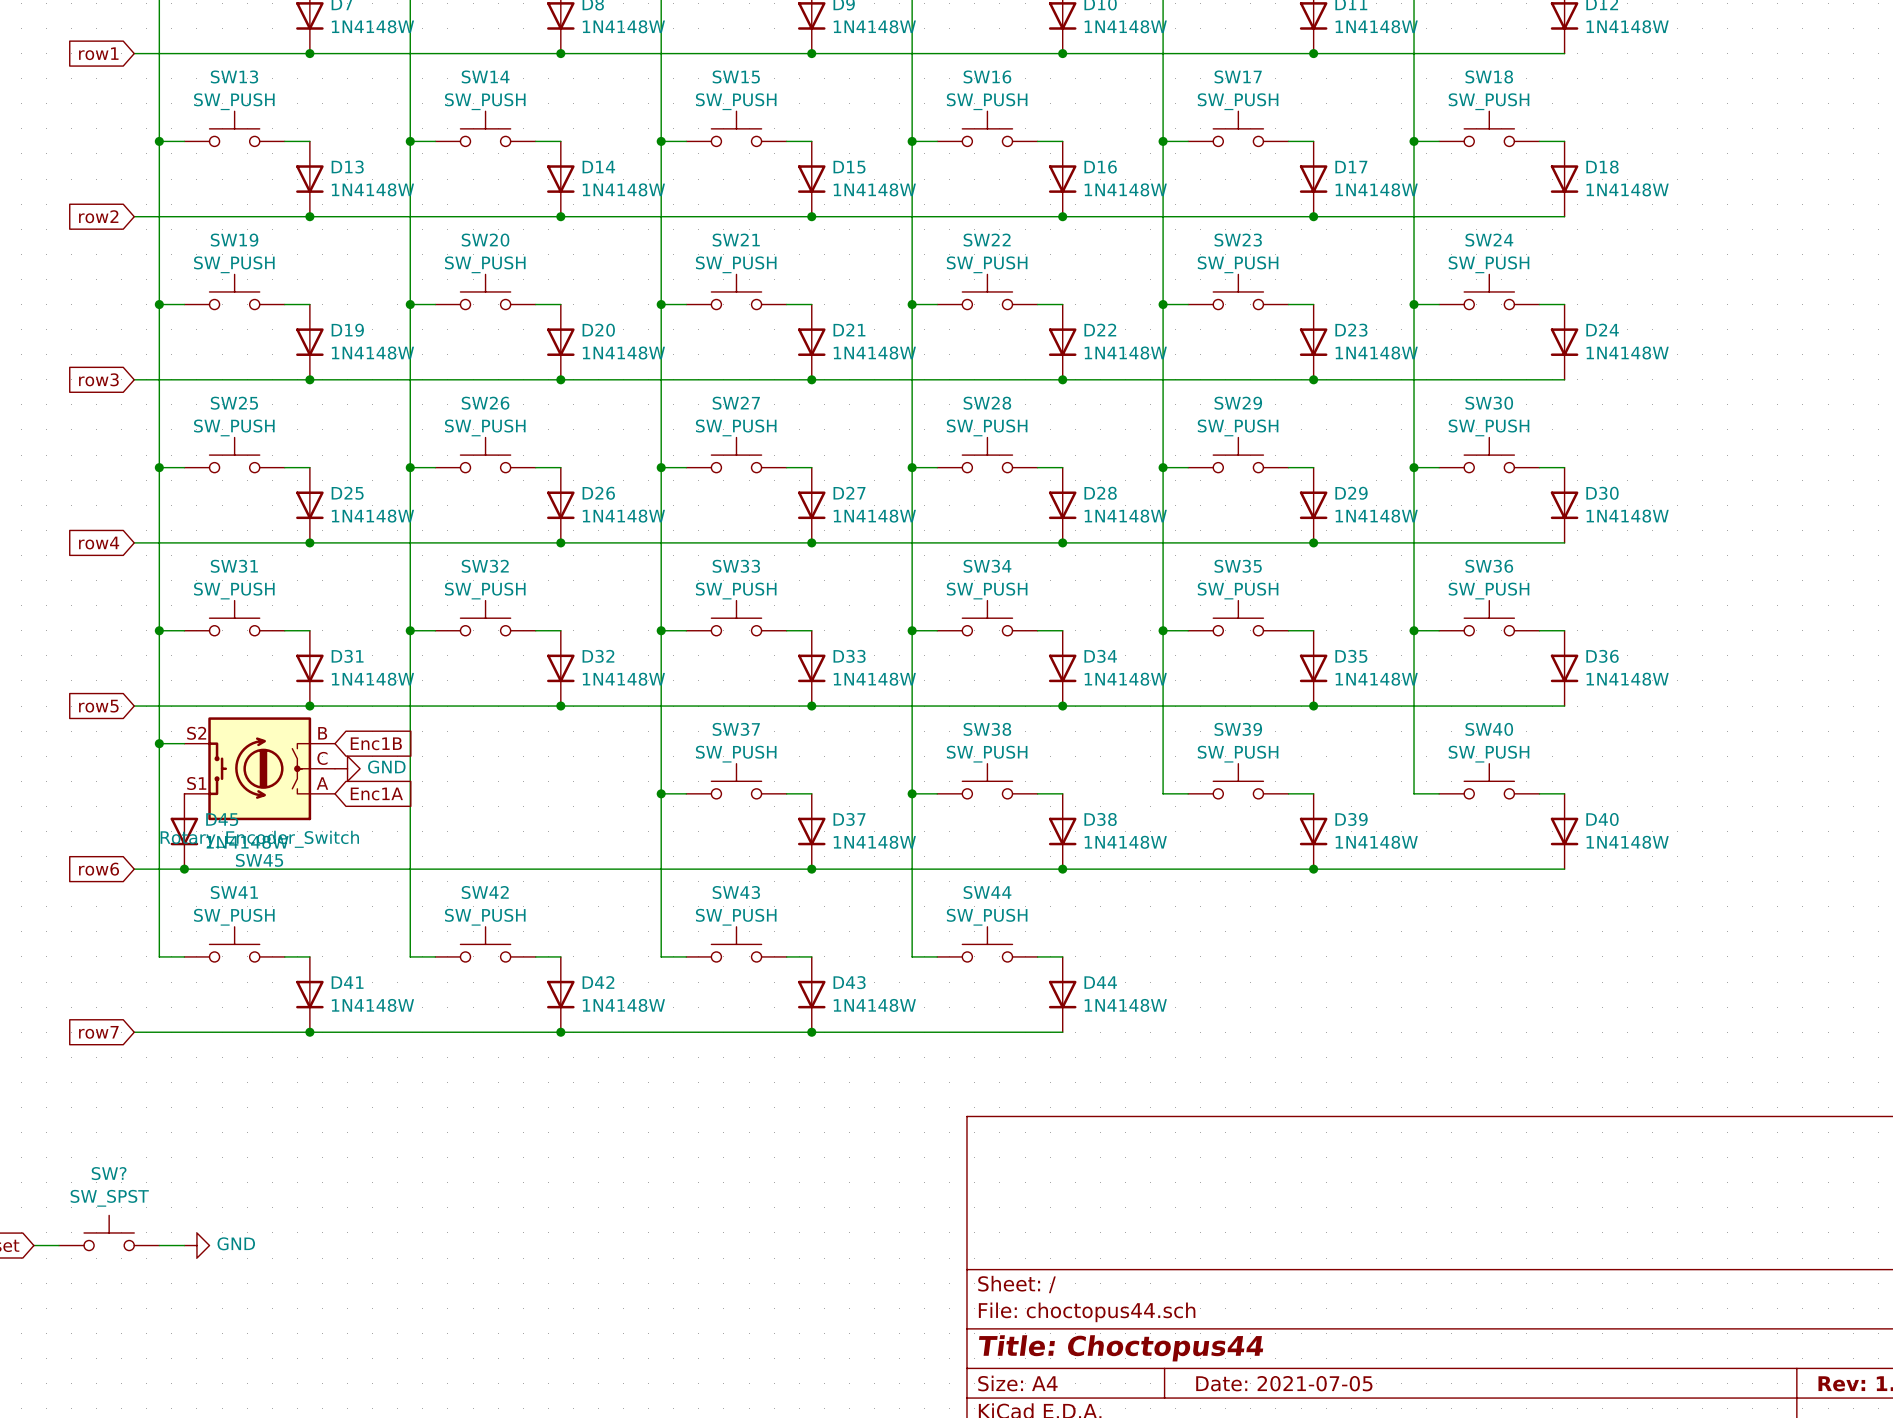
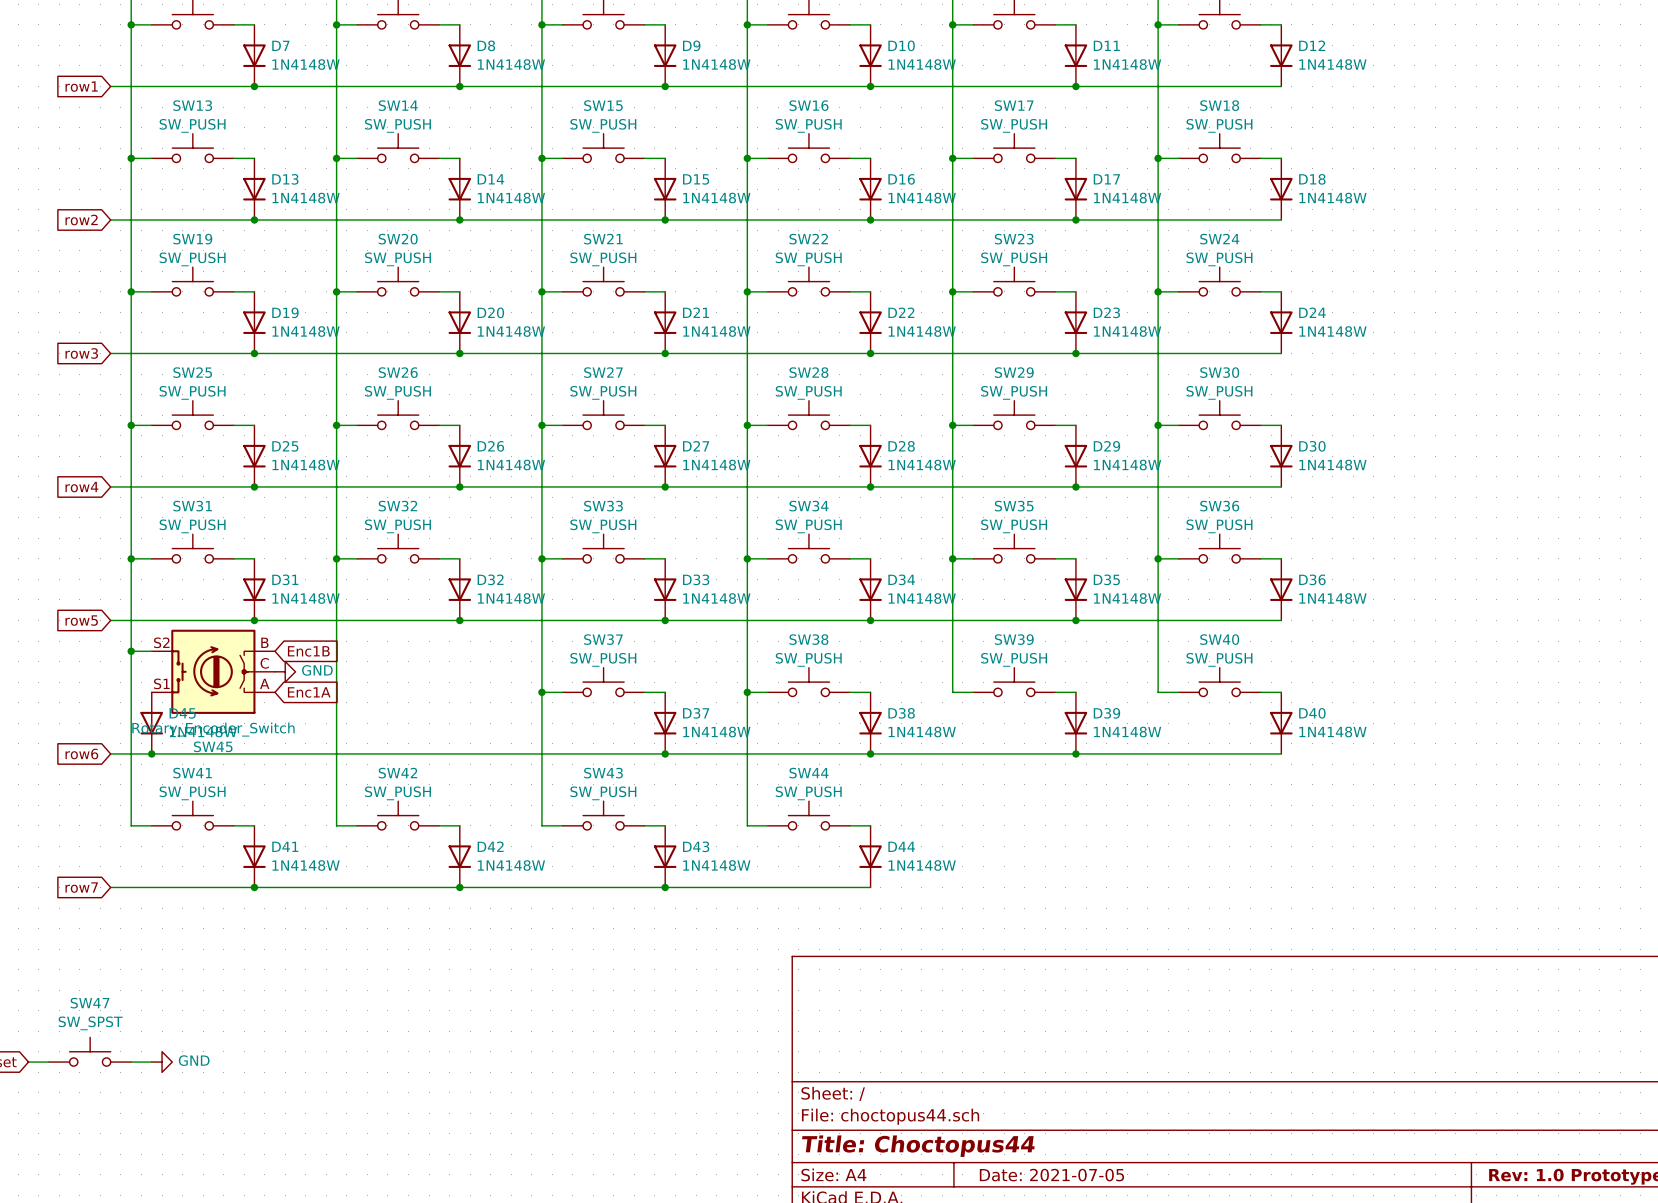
SW? name: SW? (109, 1173) -> SW47 (90, 1003)

